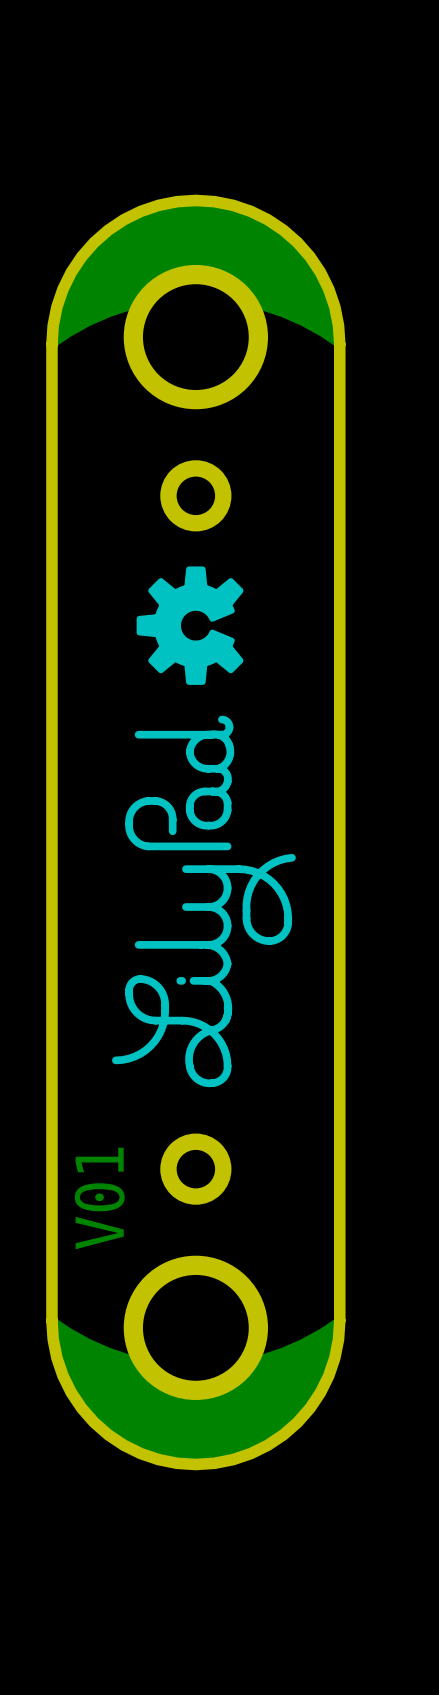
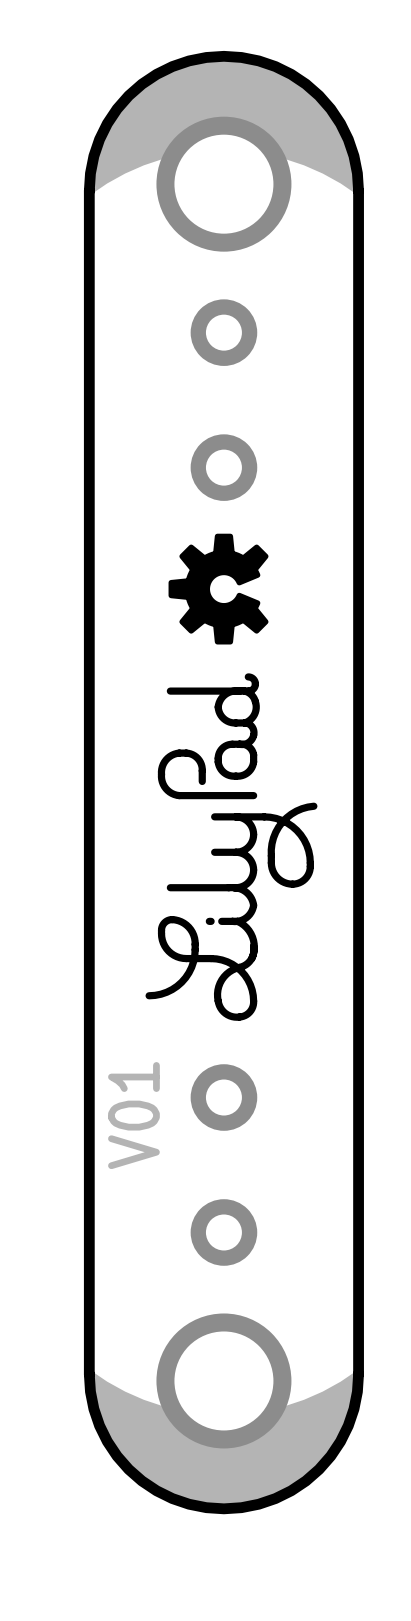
part position: (195, 304) -> (223, 153)
board edge: (339, 344) (338, 325) (328, 289) (320, 272) (297, 242) (267, 219) (250, 211) (214, 201) (195, 200) (177, 201) (140, 211) (123, 219) (94, 242) (71, 272) (62, 289) (53, 325) (51, 344) -> (358, 325) (357, 173) (353, 156) (340, 123) (319, 95) (291, 74) (258, 60) (223, 56) (189, 60) (156, 74) (128, 95) (107, 123) (93, 156) (90, 173) (89, 325)
part: none -> (223, 332)
part: none -> (223, 1232)
board edge: (339, 1320) (338, 1339) (328, 1375) (320, 1392) (297, 1422) (267, 1445) (250, 1453) (214, 1463) (195, 1464) (177, 1463) (140, 1453) (123, 1445) (94, 1422) (71, 1392) (62, 1375) (53, 1339) (51, 1320) -> (358, 1239) (357, 1391) (353, 1409) (340, 1441) (319, 1469) (291, 1490) (258, 1504) (223, 1508) (189, 1504) (156, 1490) (128, 1469) (107, 1441) (93, 1409) (90, 1391) (89, 1239)
part position: (195, 1360) -> (223, 1411)

